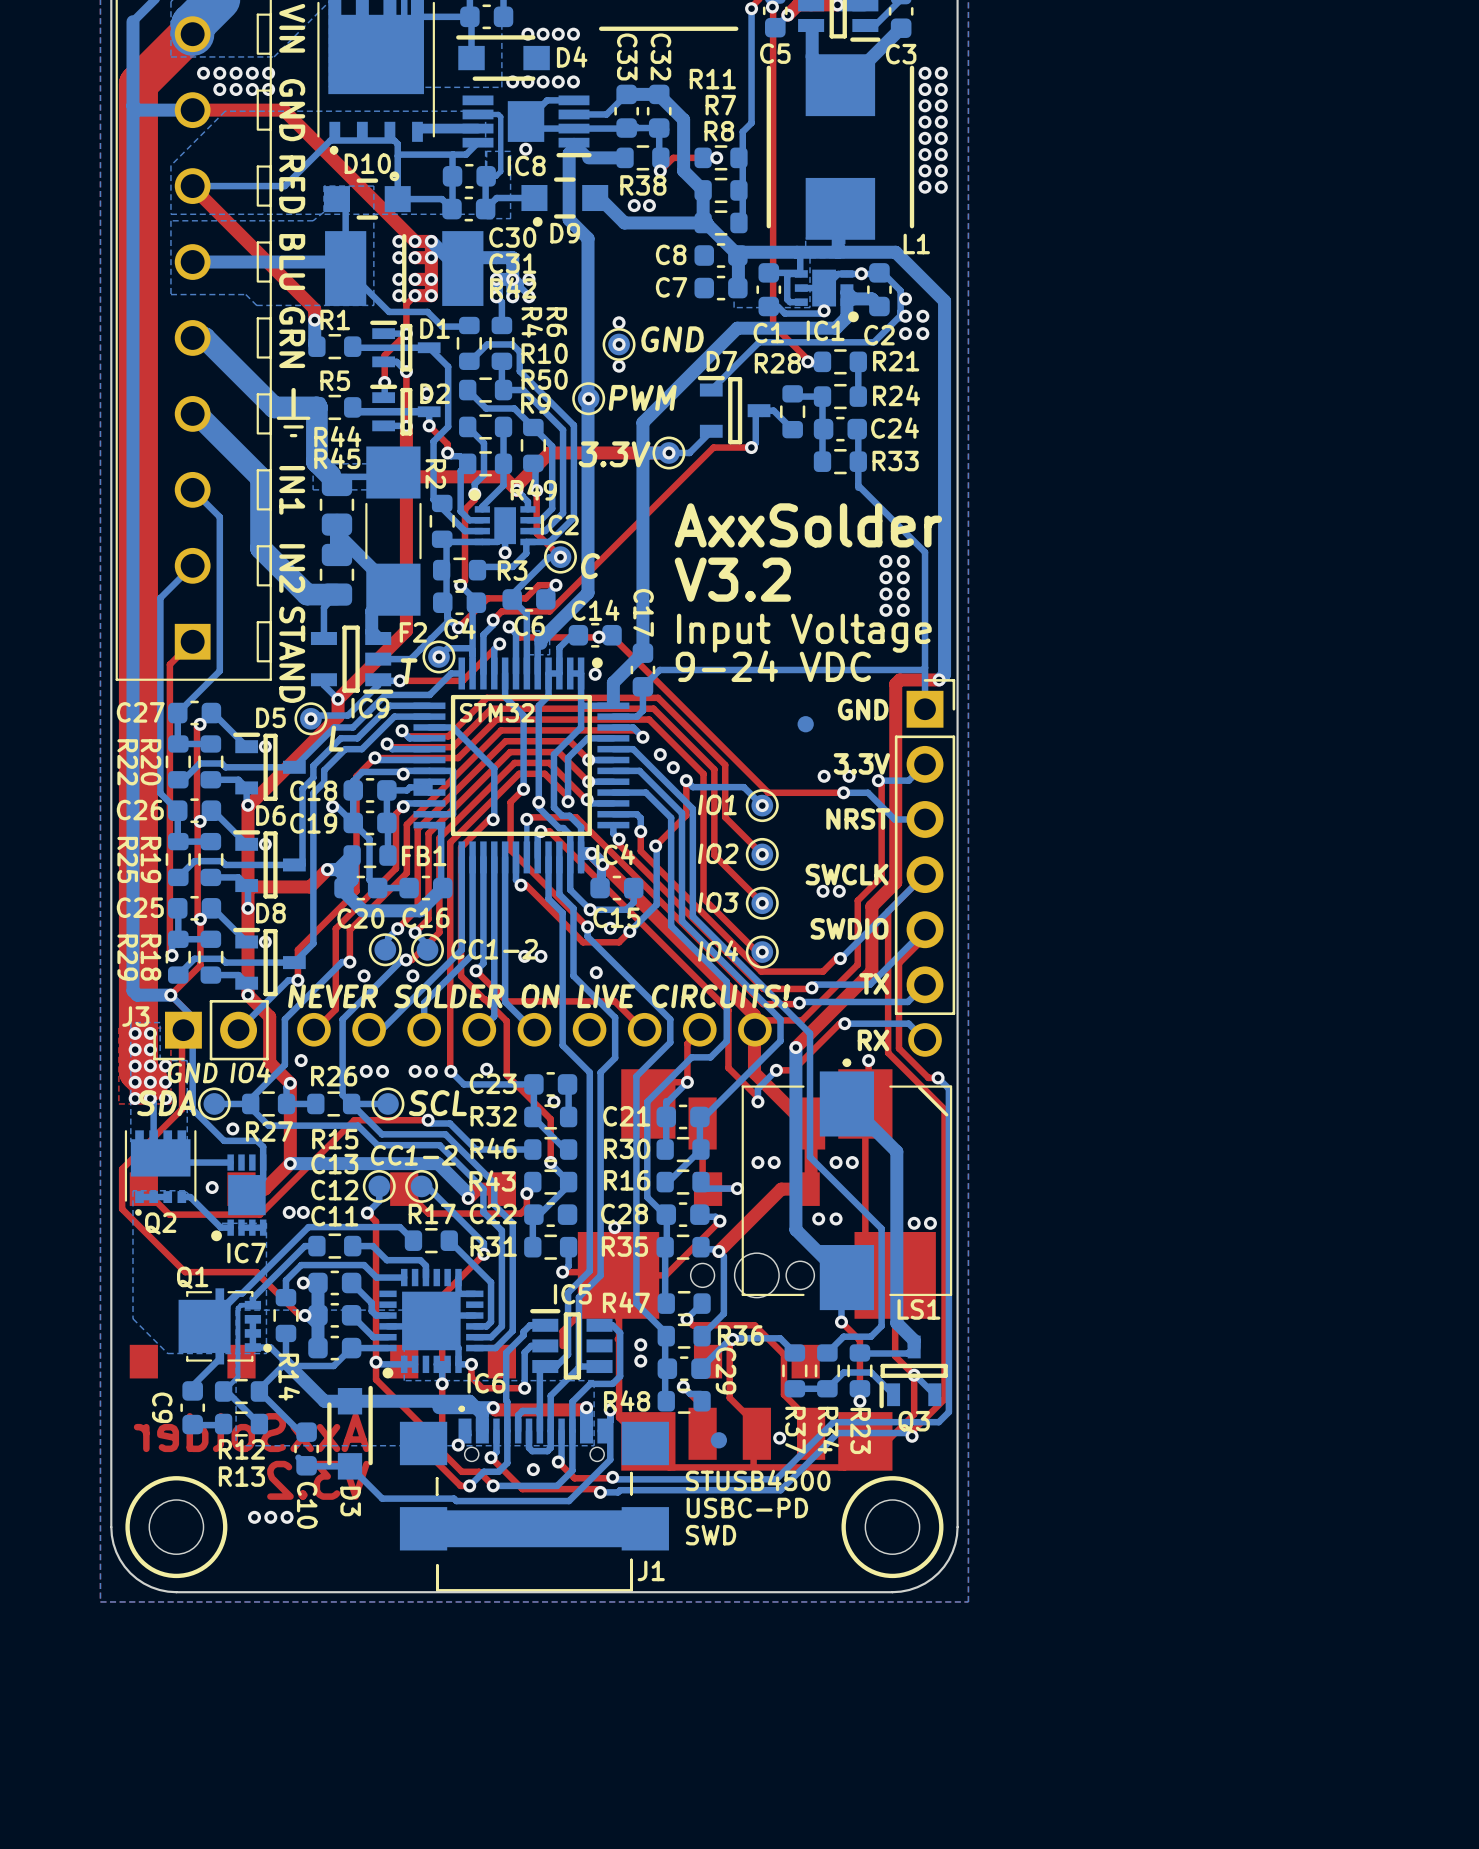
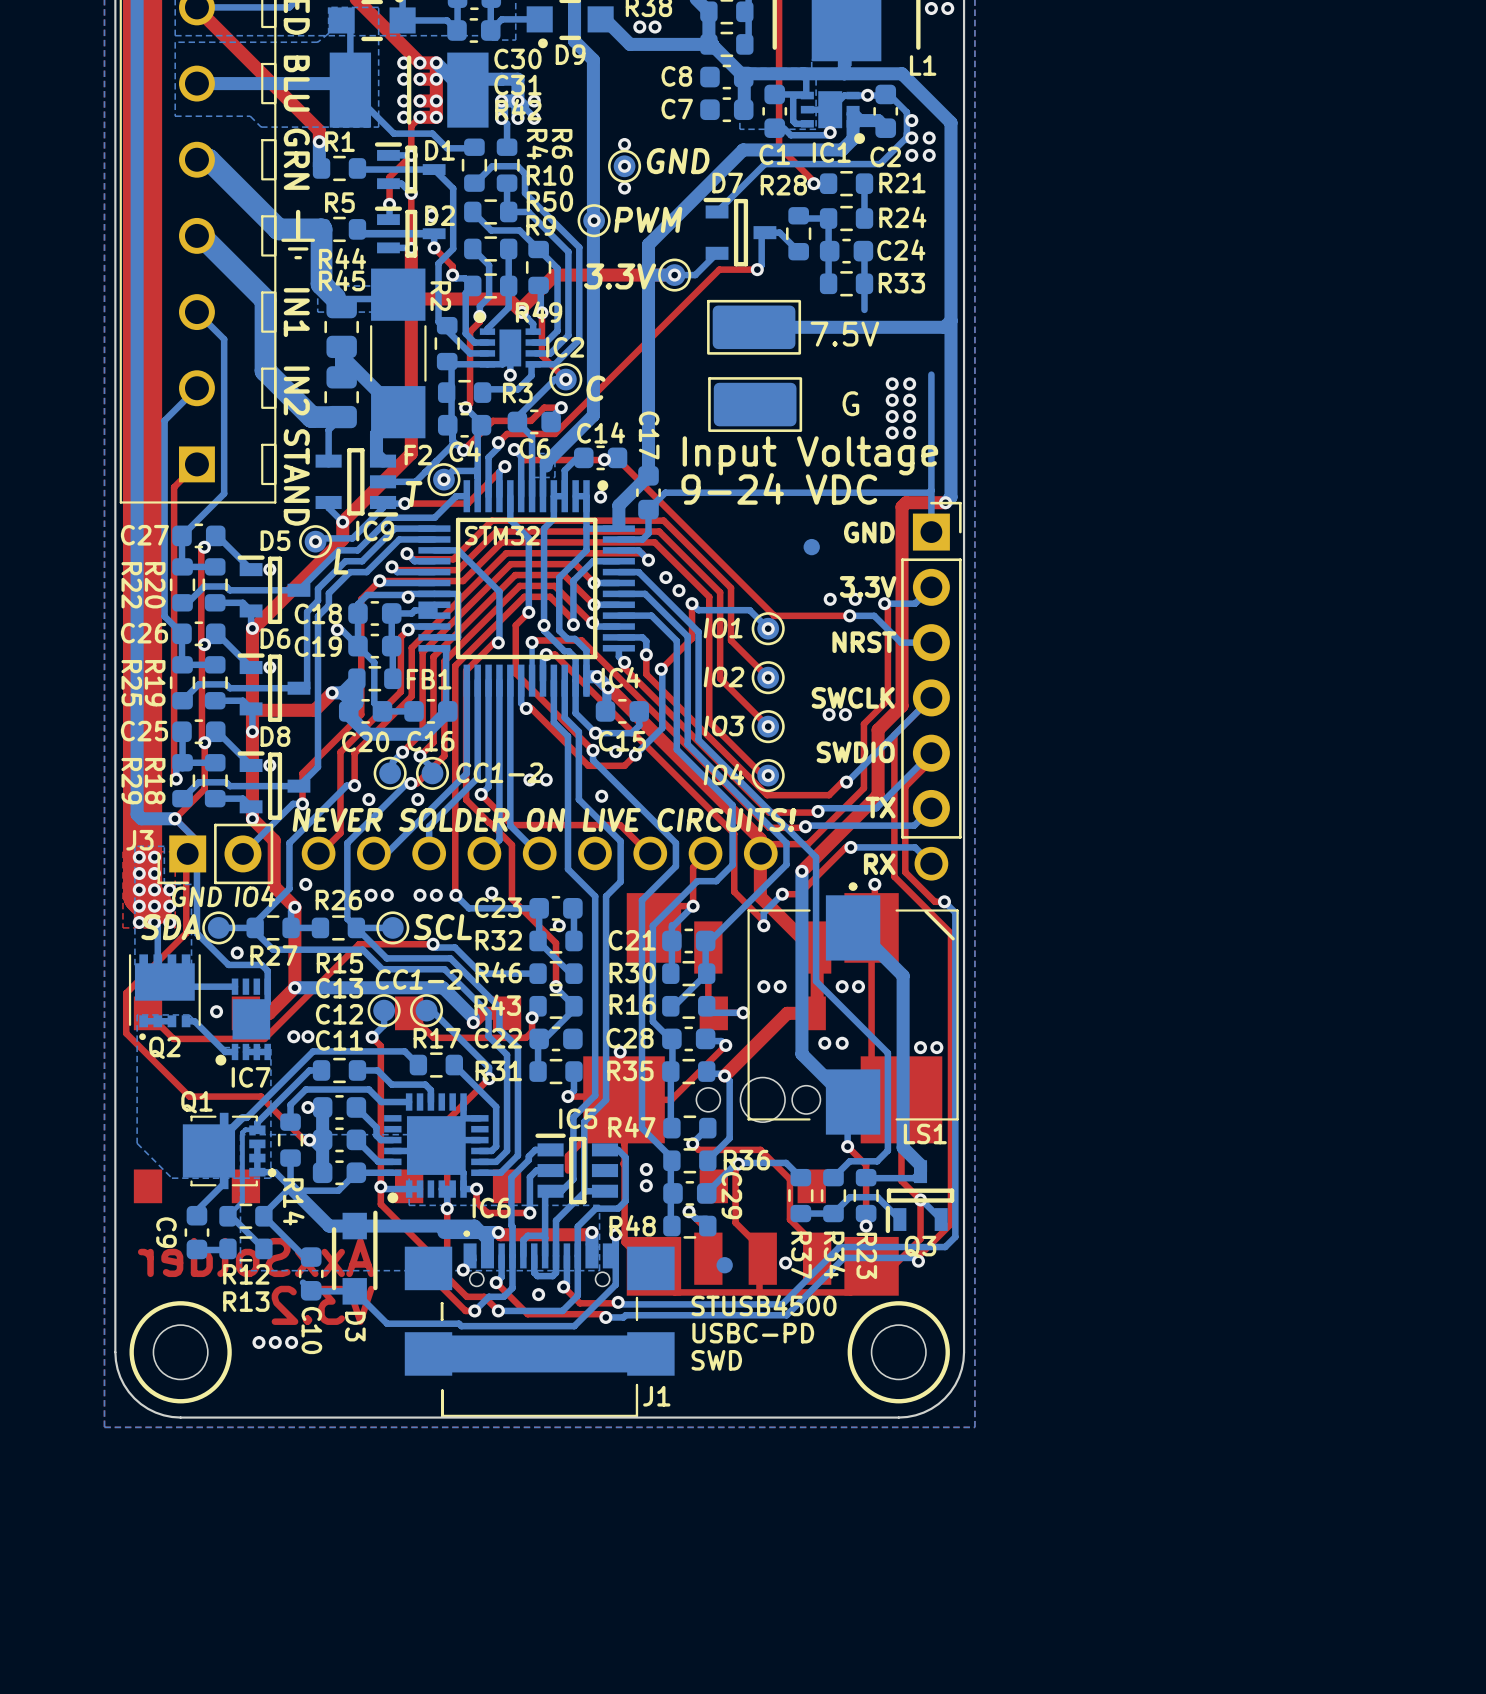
bottom track: (858, 485) (925, 552) -> none
bottom track: none -> (950, 320) (944, 327) (754, 327)
7.5V: none -> (754, 327)
text: AxxSolder (808, 525) -> none
text: V3.2 (732, 579) -> none
G: none -> (755, 404)

